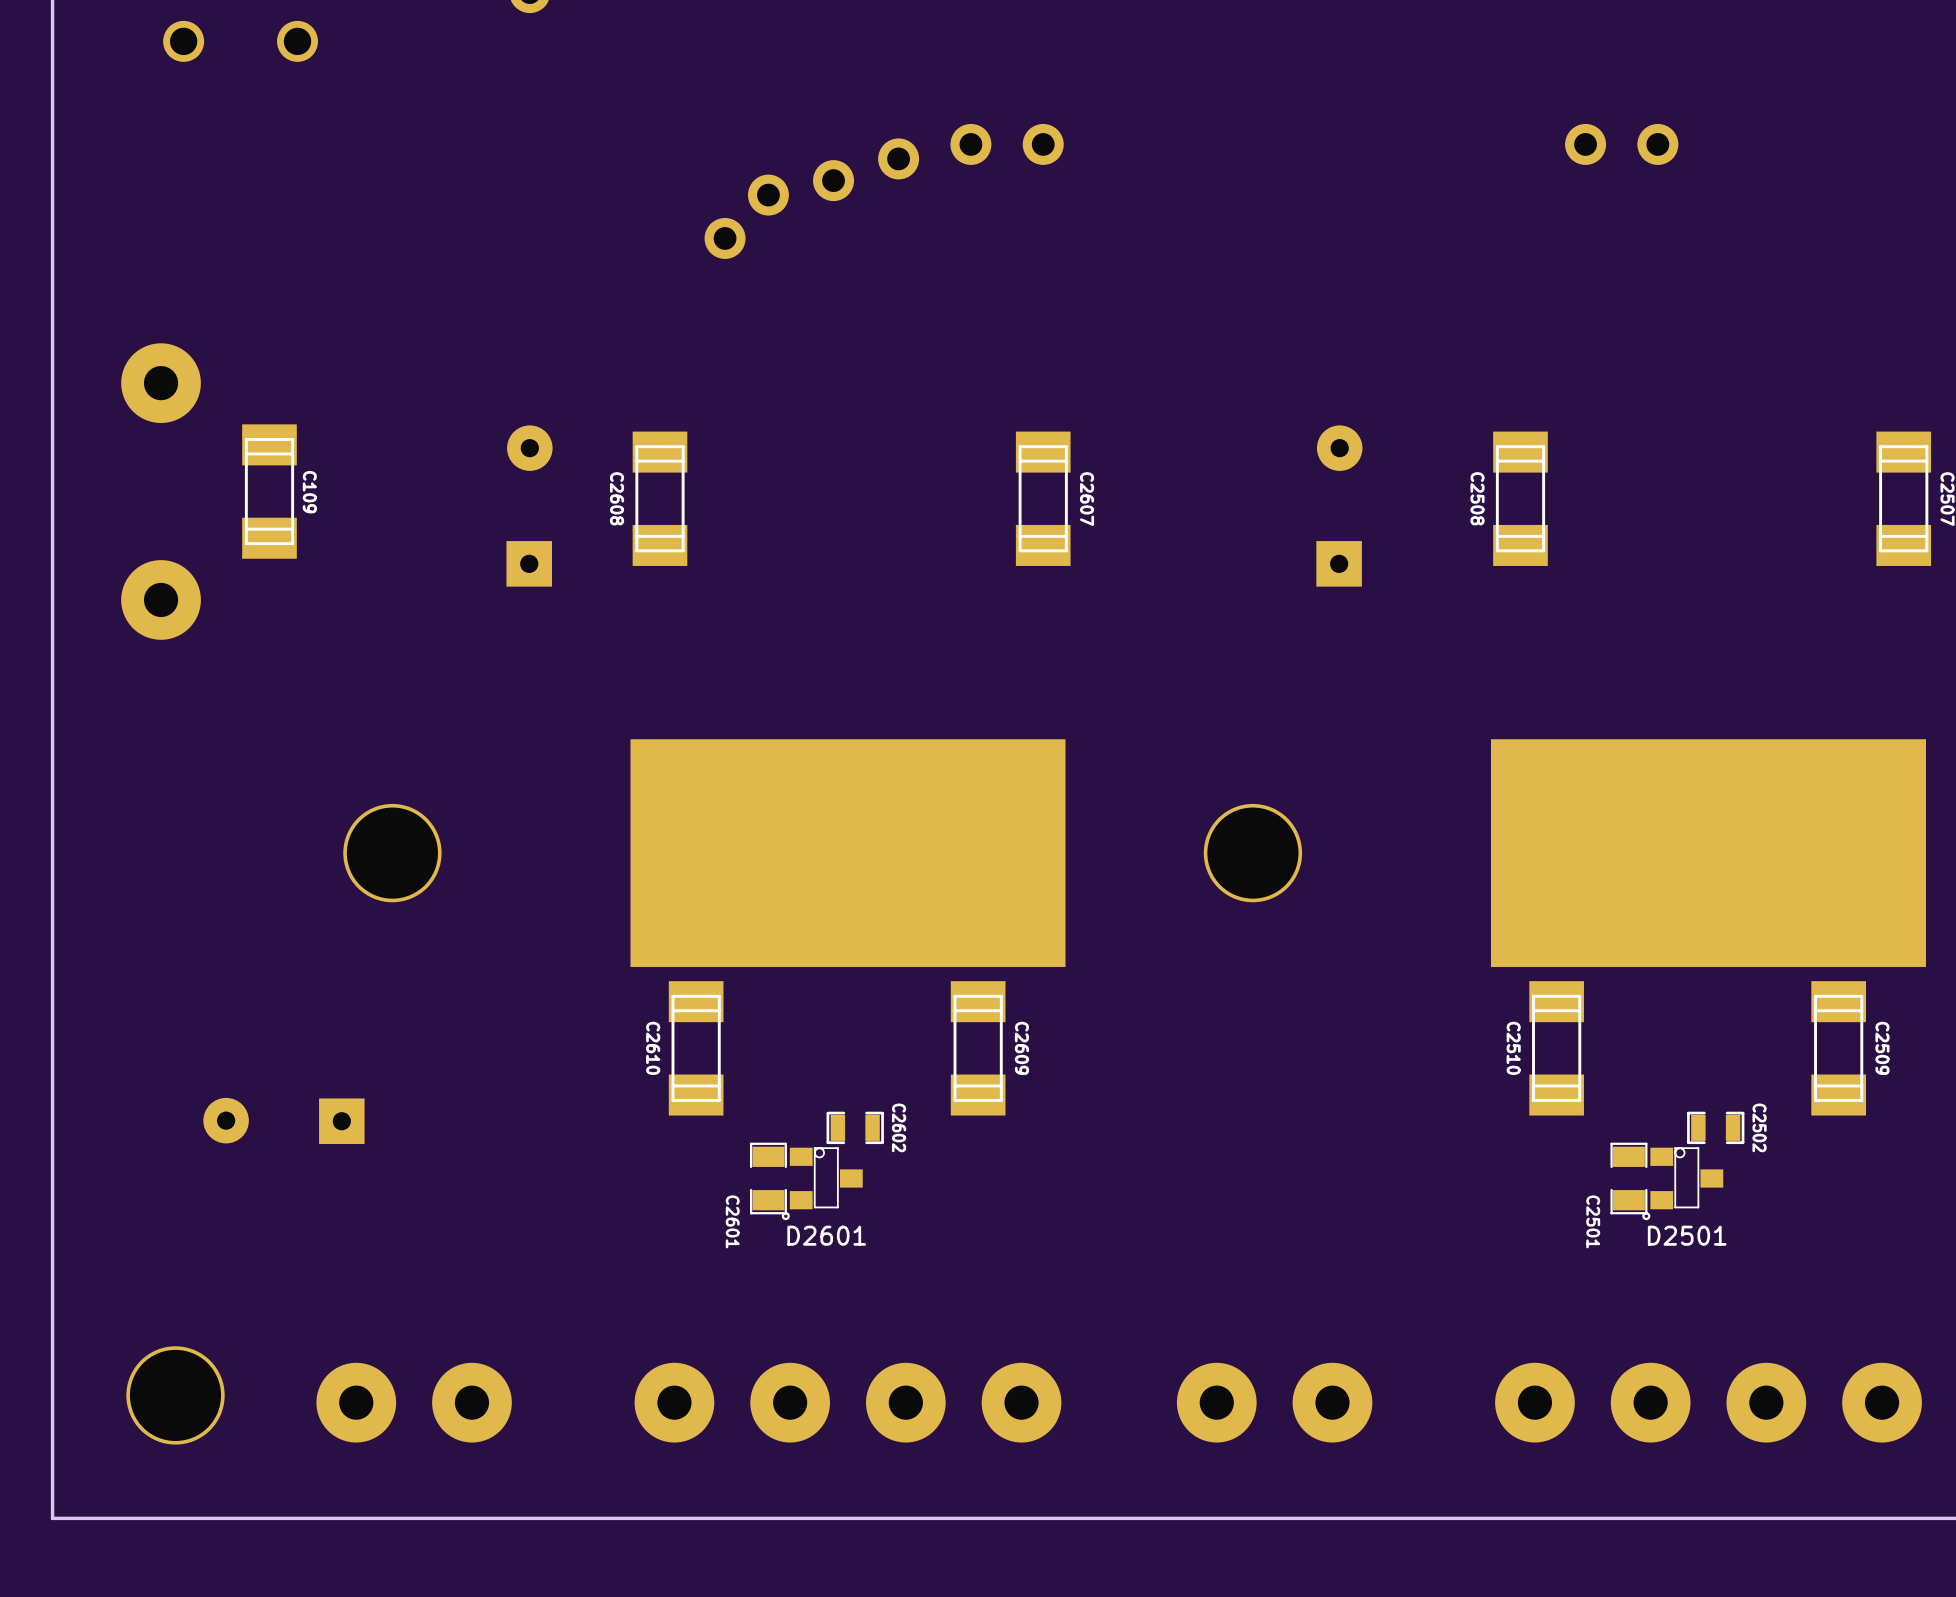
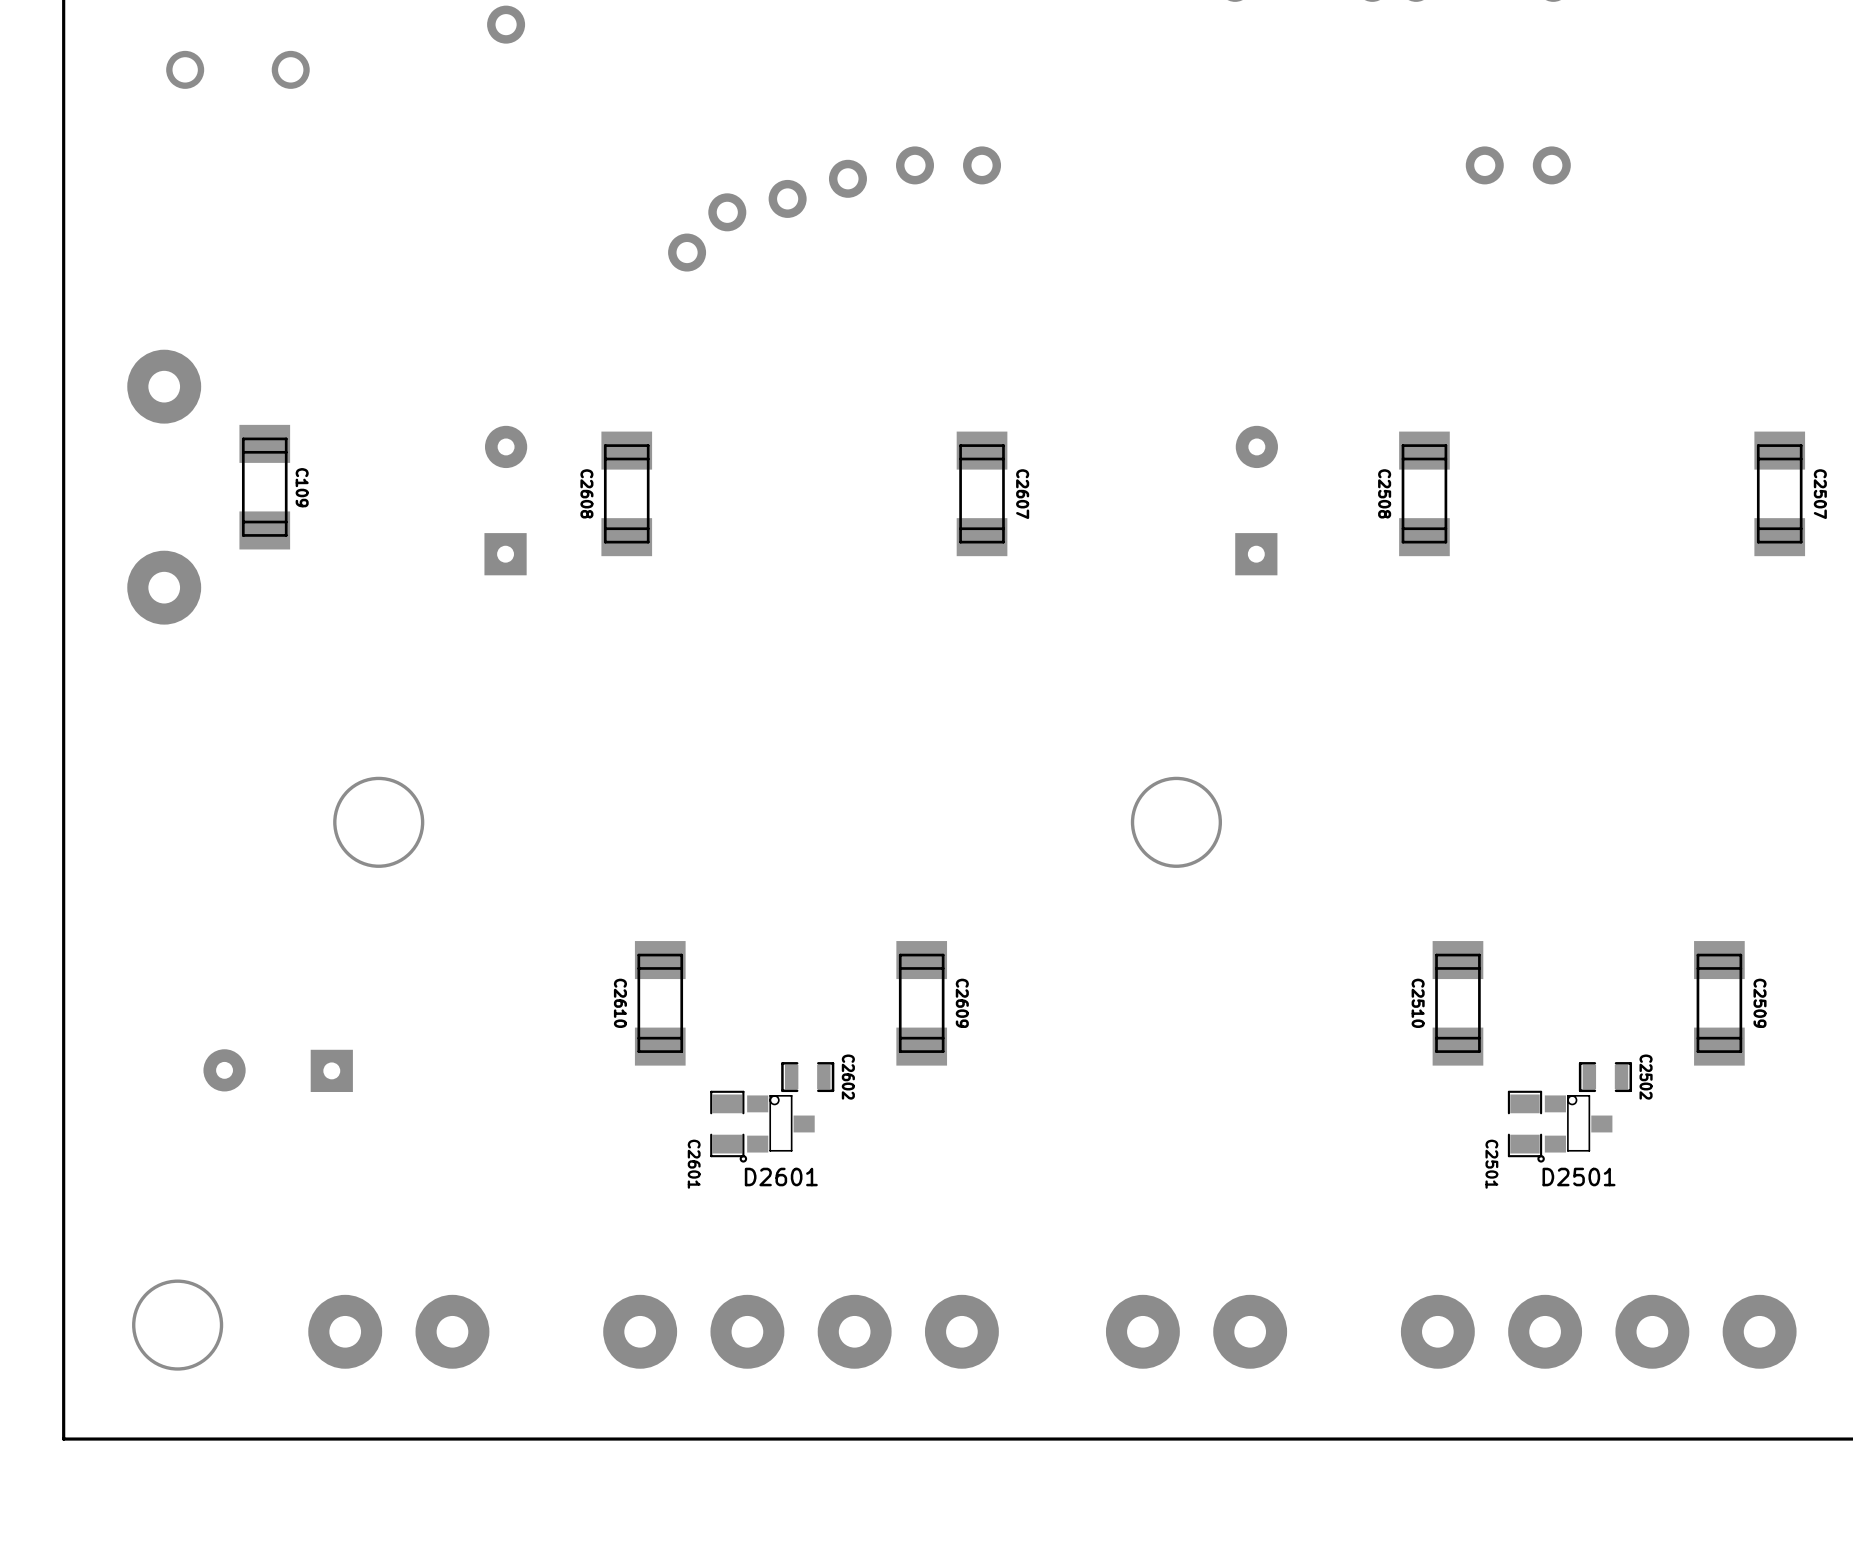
part: (847, 853) -> none
part: (1708, 853) -> none

